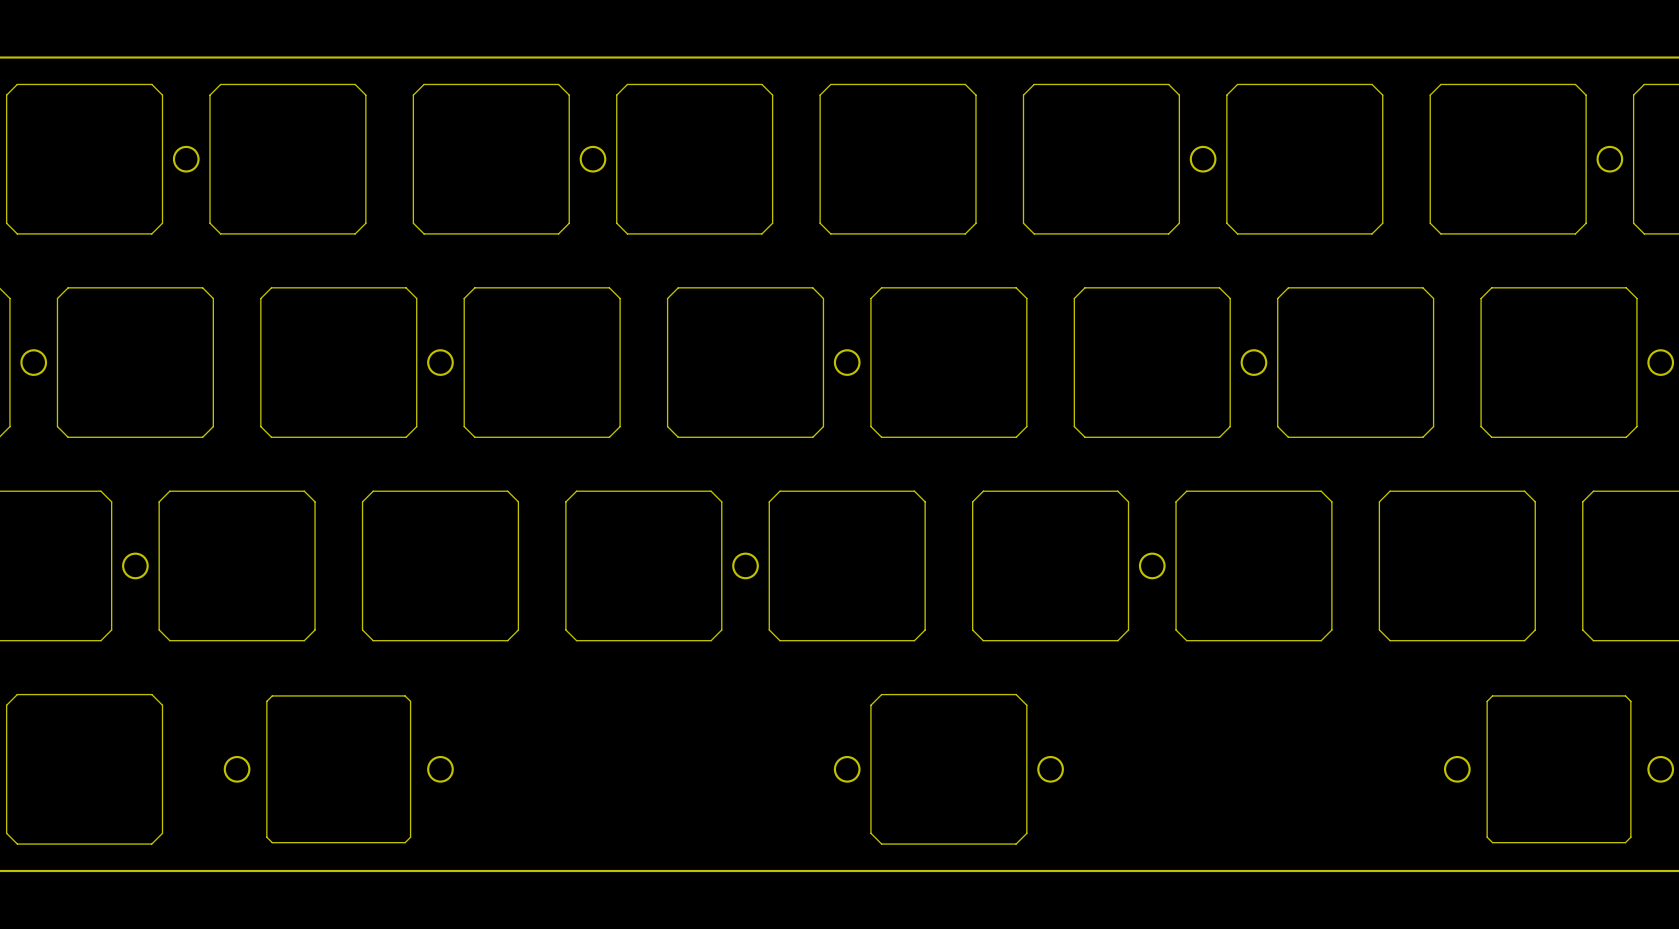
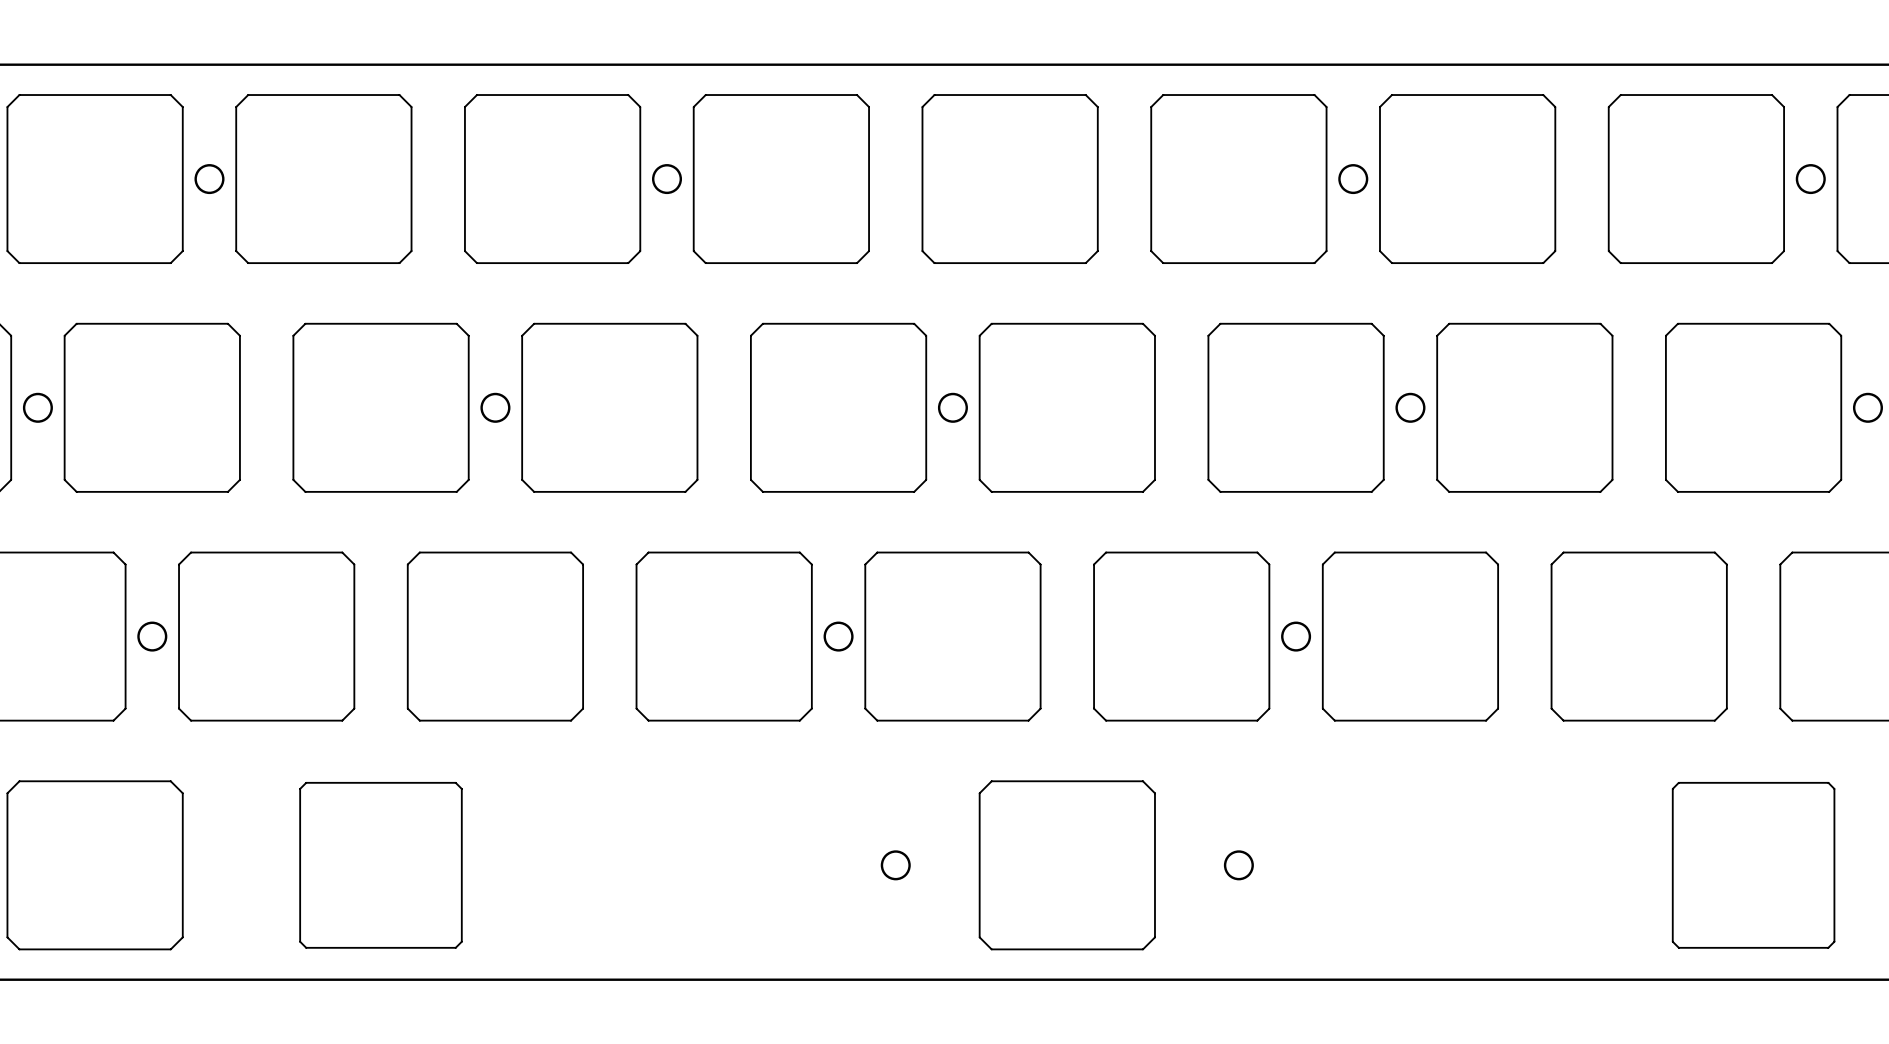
round board edge: [223, 755, 251, 783] -> none
round board edge: [427, 755, 454, 783] -> none
round board edge: [1443, 755, 1471, 783] -> none
round board edge: [1647, 755, 1675, 783] -> none
round board edge position: (847, 769) -> (895, 865)
round board edge position: (1050, 769) -> (1238, 865)

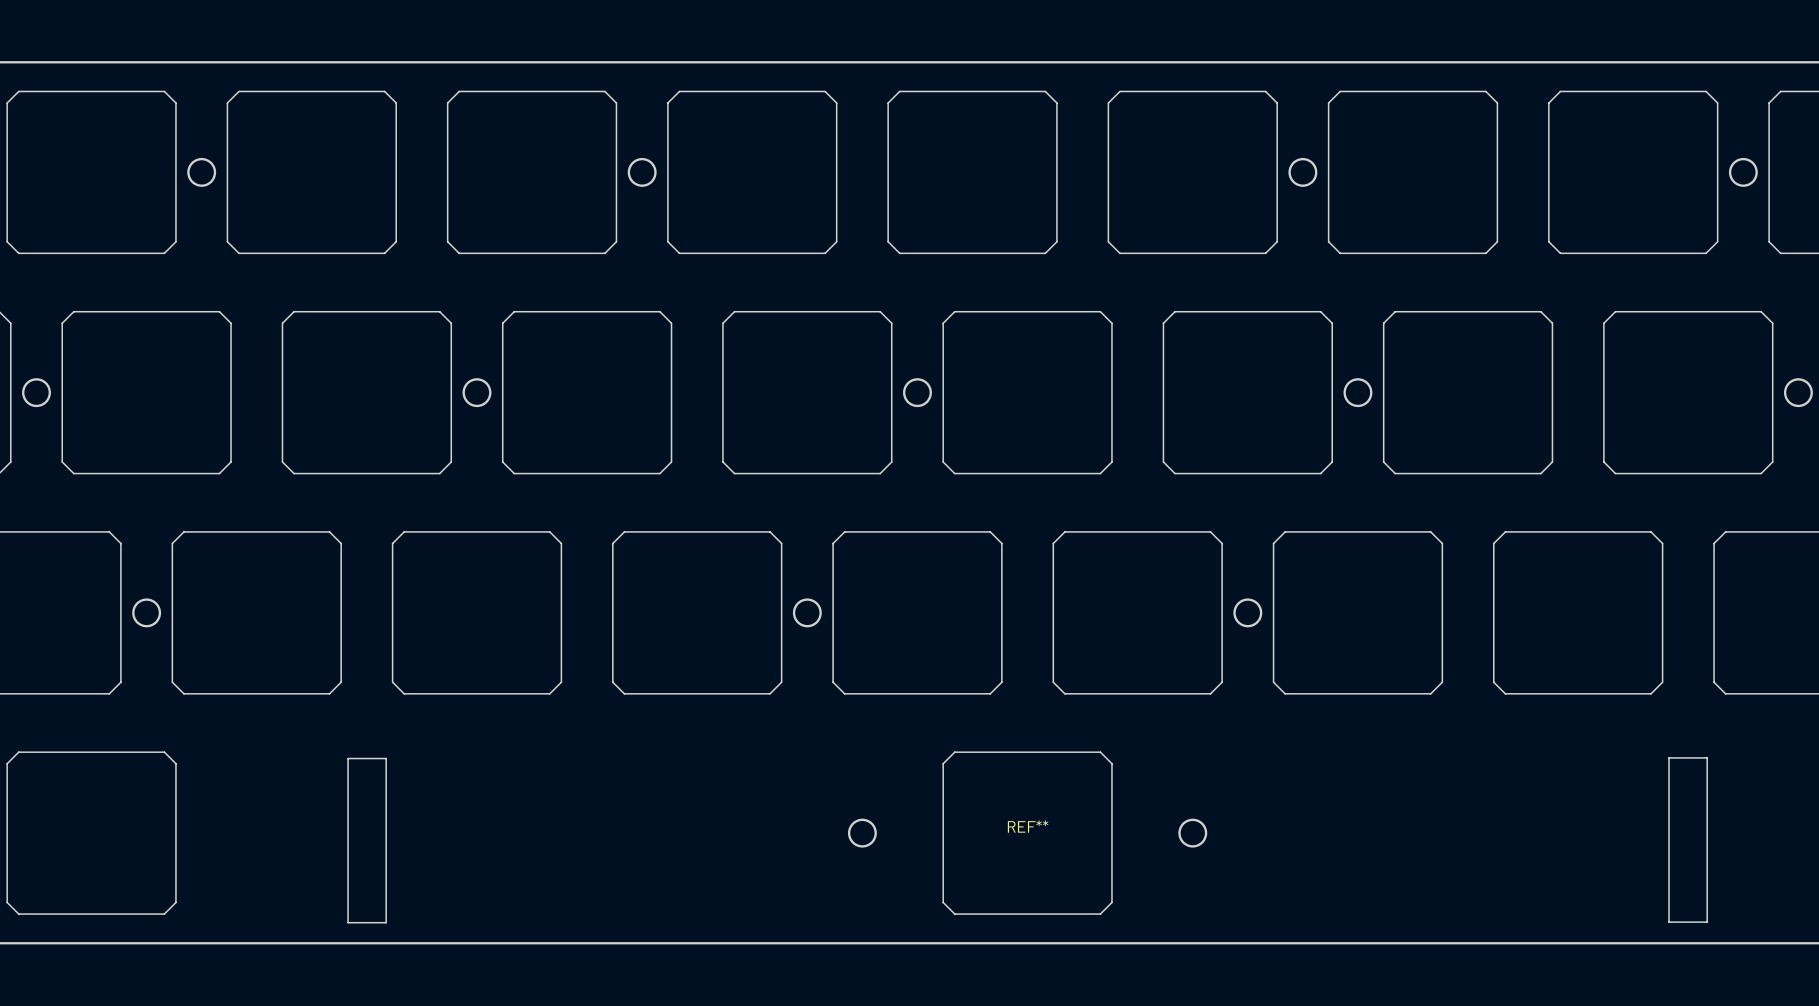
drawing: [299, 782, 1836, 949] -> none
REF**: none -> (1027, 840)

